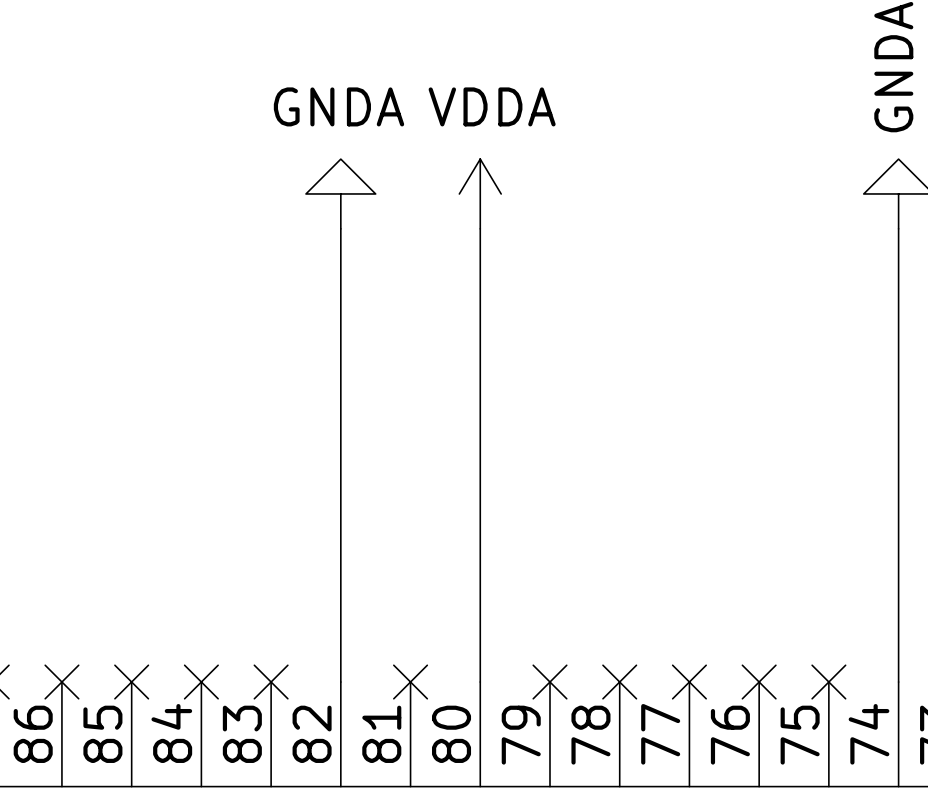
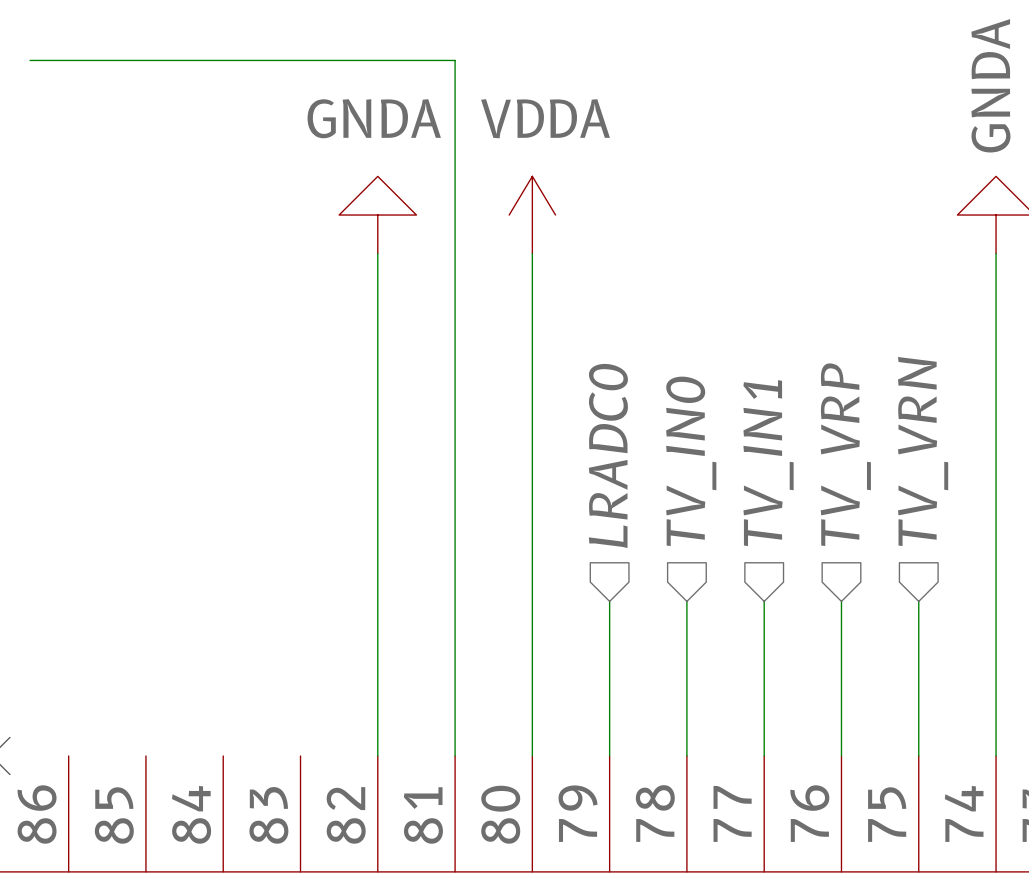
wire: none -> (30, 60) (455, 60) (455, 755)
hierarchical label: none -> LRADC0 (608, 455)
hierarchical label: none -> TV_VRP (845, 454)
hierarchical label: none -> TV_VRN (923, 451)
hierarchical label: none -> TV_IN0 (691, 461)
hierarchical label: none -> TV_IN1 (768, 463)
wire: none -> (609, 601) (609, 755)
wire: none -> (686, 601) (686, 755)
wire: none -> (764, 601) (764, 755)
wire: none -> (841, 601) (841, 755)
wire: none -> (918, 601) (918, 755)
no-connect mark: (61, 682) -> none
no-connect mark: (131, 682) -> none
no-connect mark: (201, 682) -> none
no-connect mark: (271, 682) -> none
no-connect mark: (410, 682) -> none
no-connect mark: (549, 682) -> none
no-connect mark: (619, 682) -> none
no-connect mark: (689, 682) -> none
no-connect mark: (759, 682) -> none
no-connect mark: (828, 682) -> none

